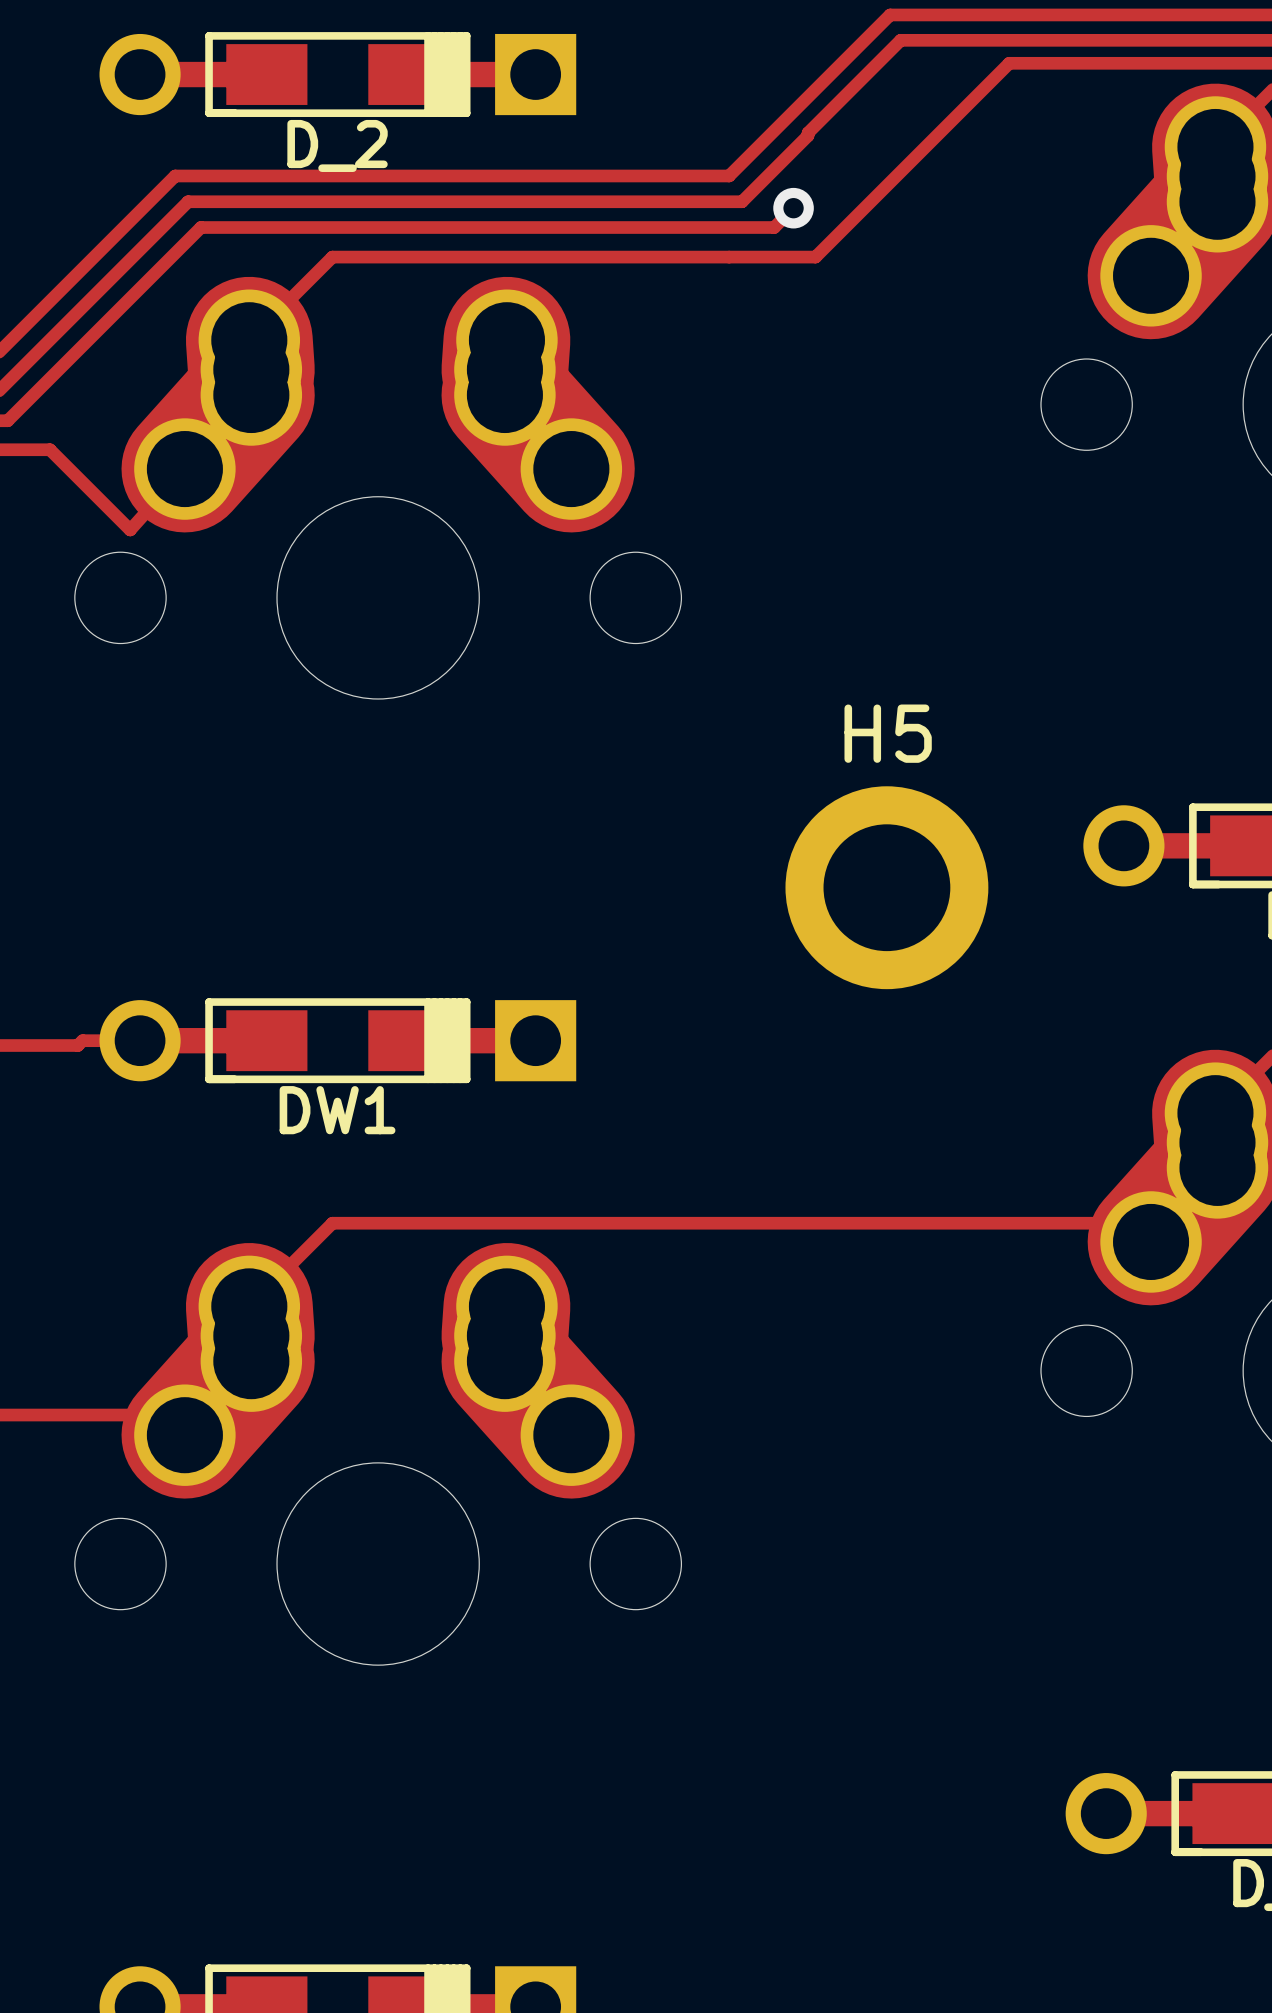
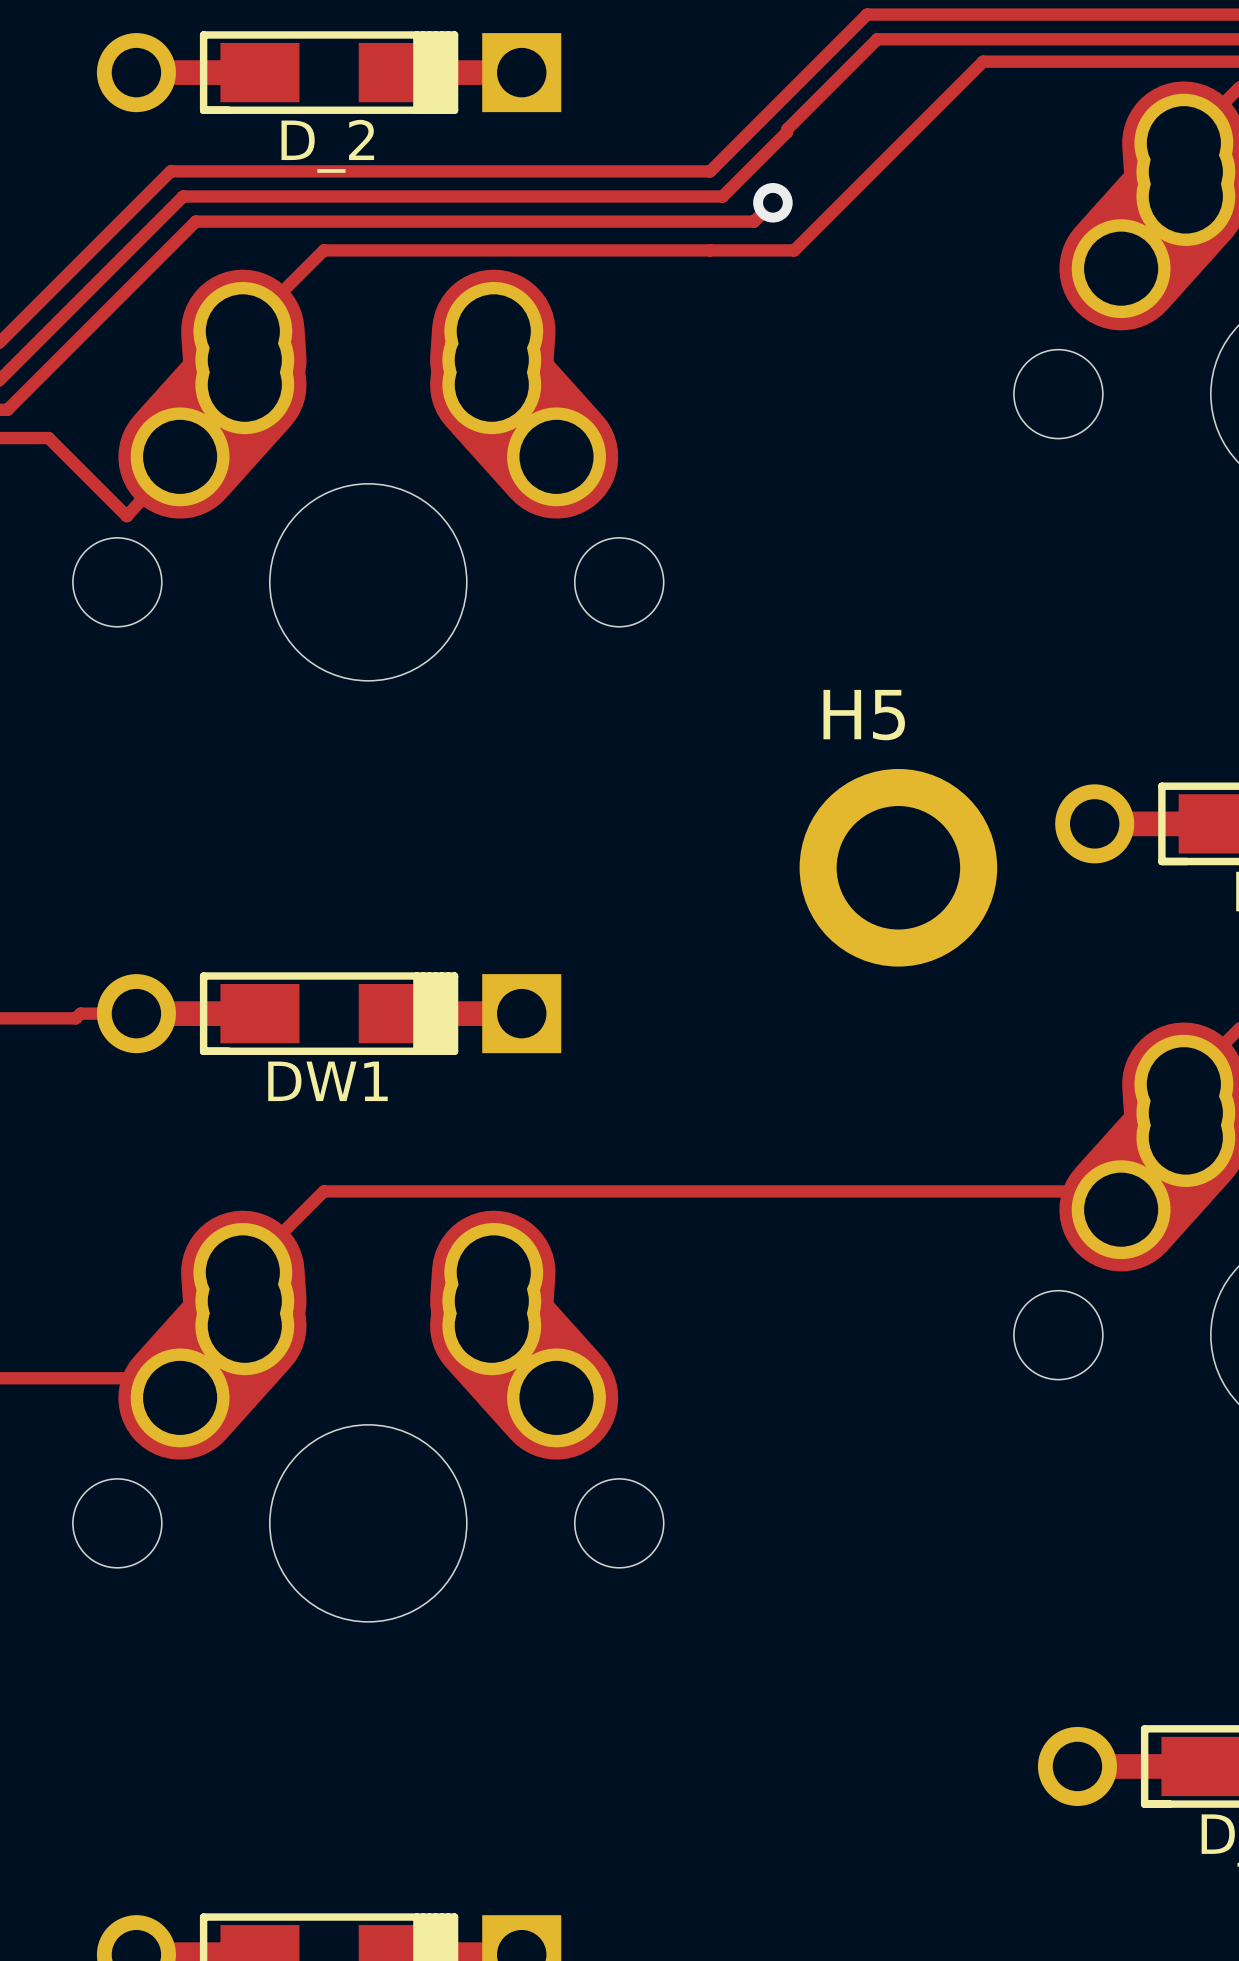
H5 position: (886, 887) -> (898, 867)

